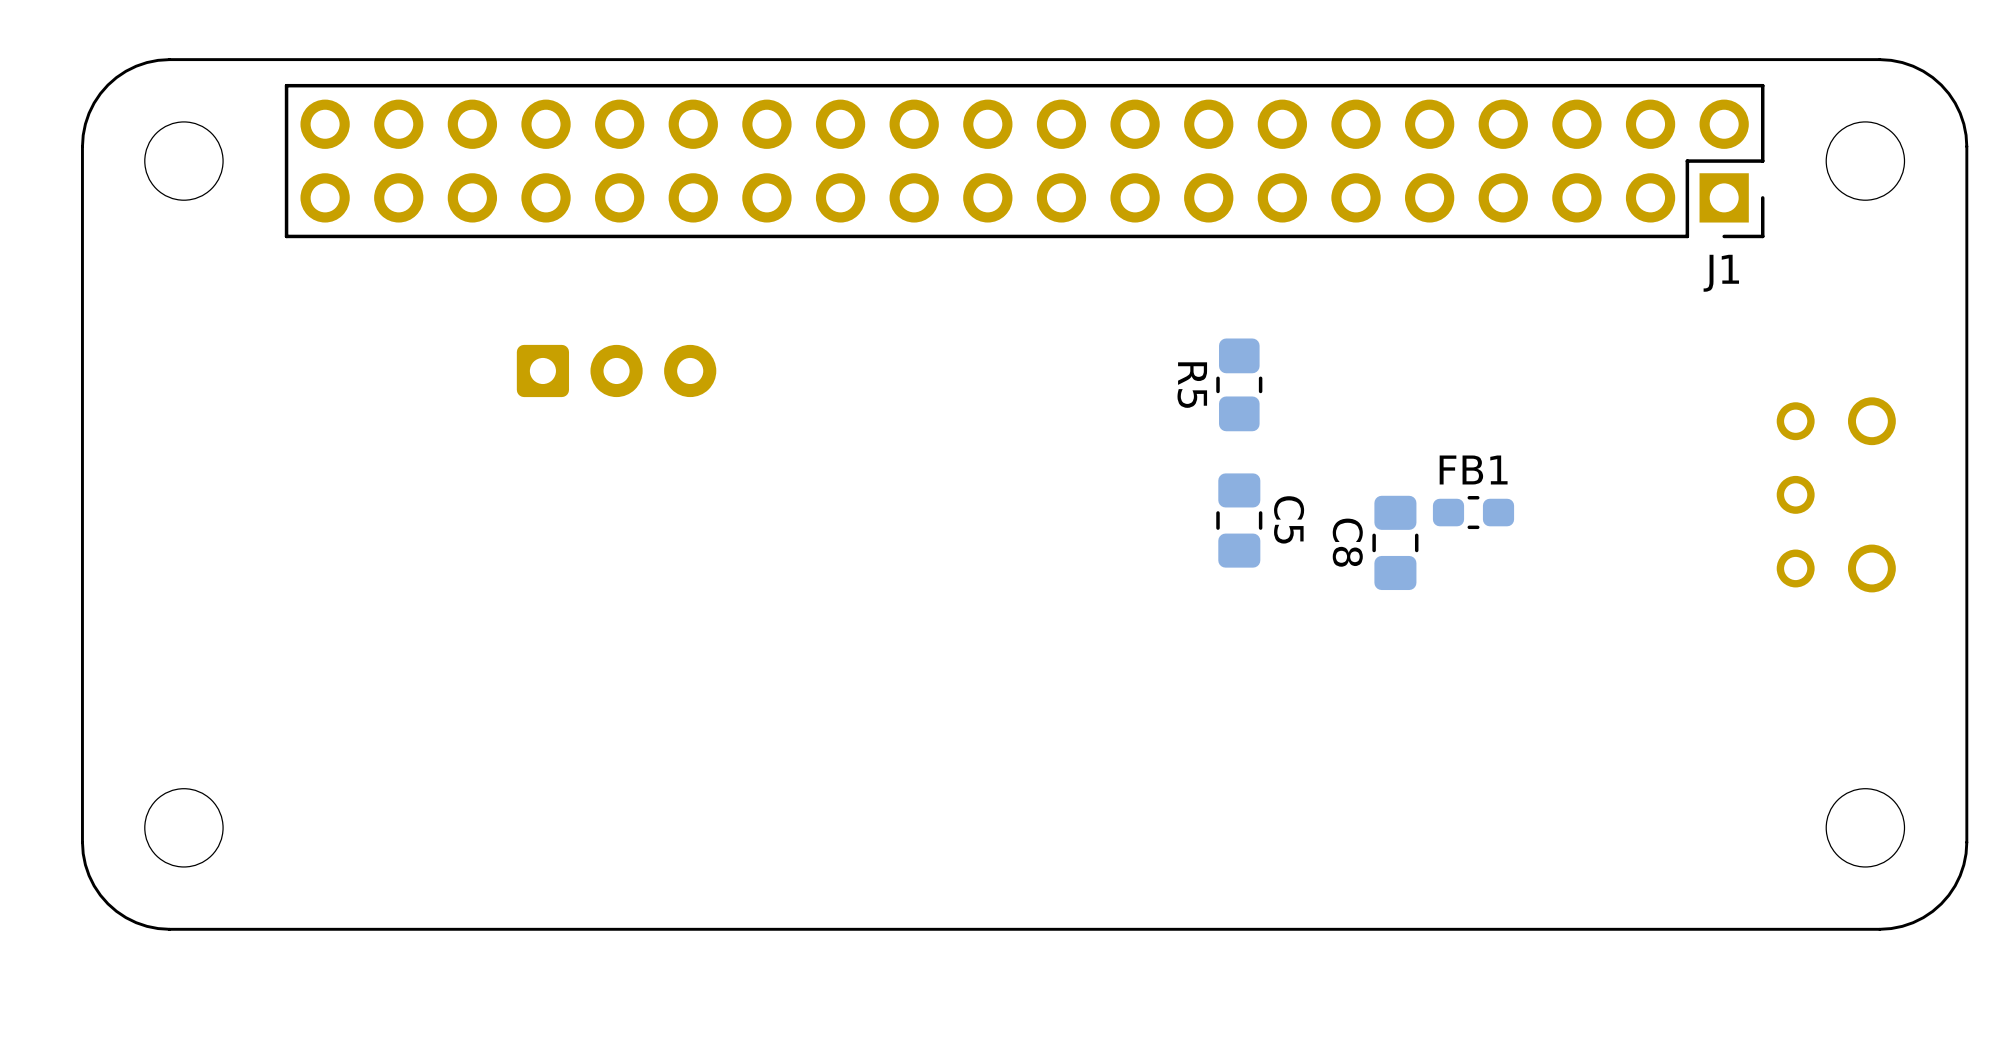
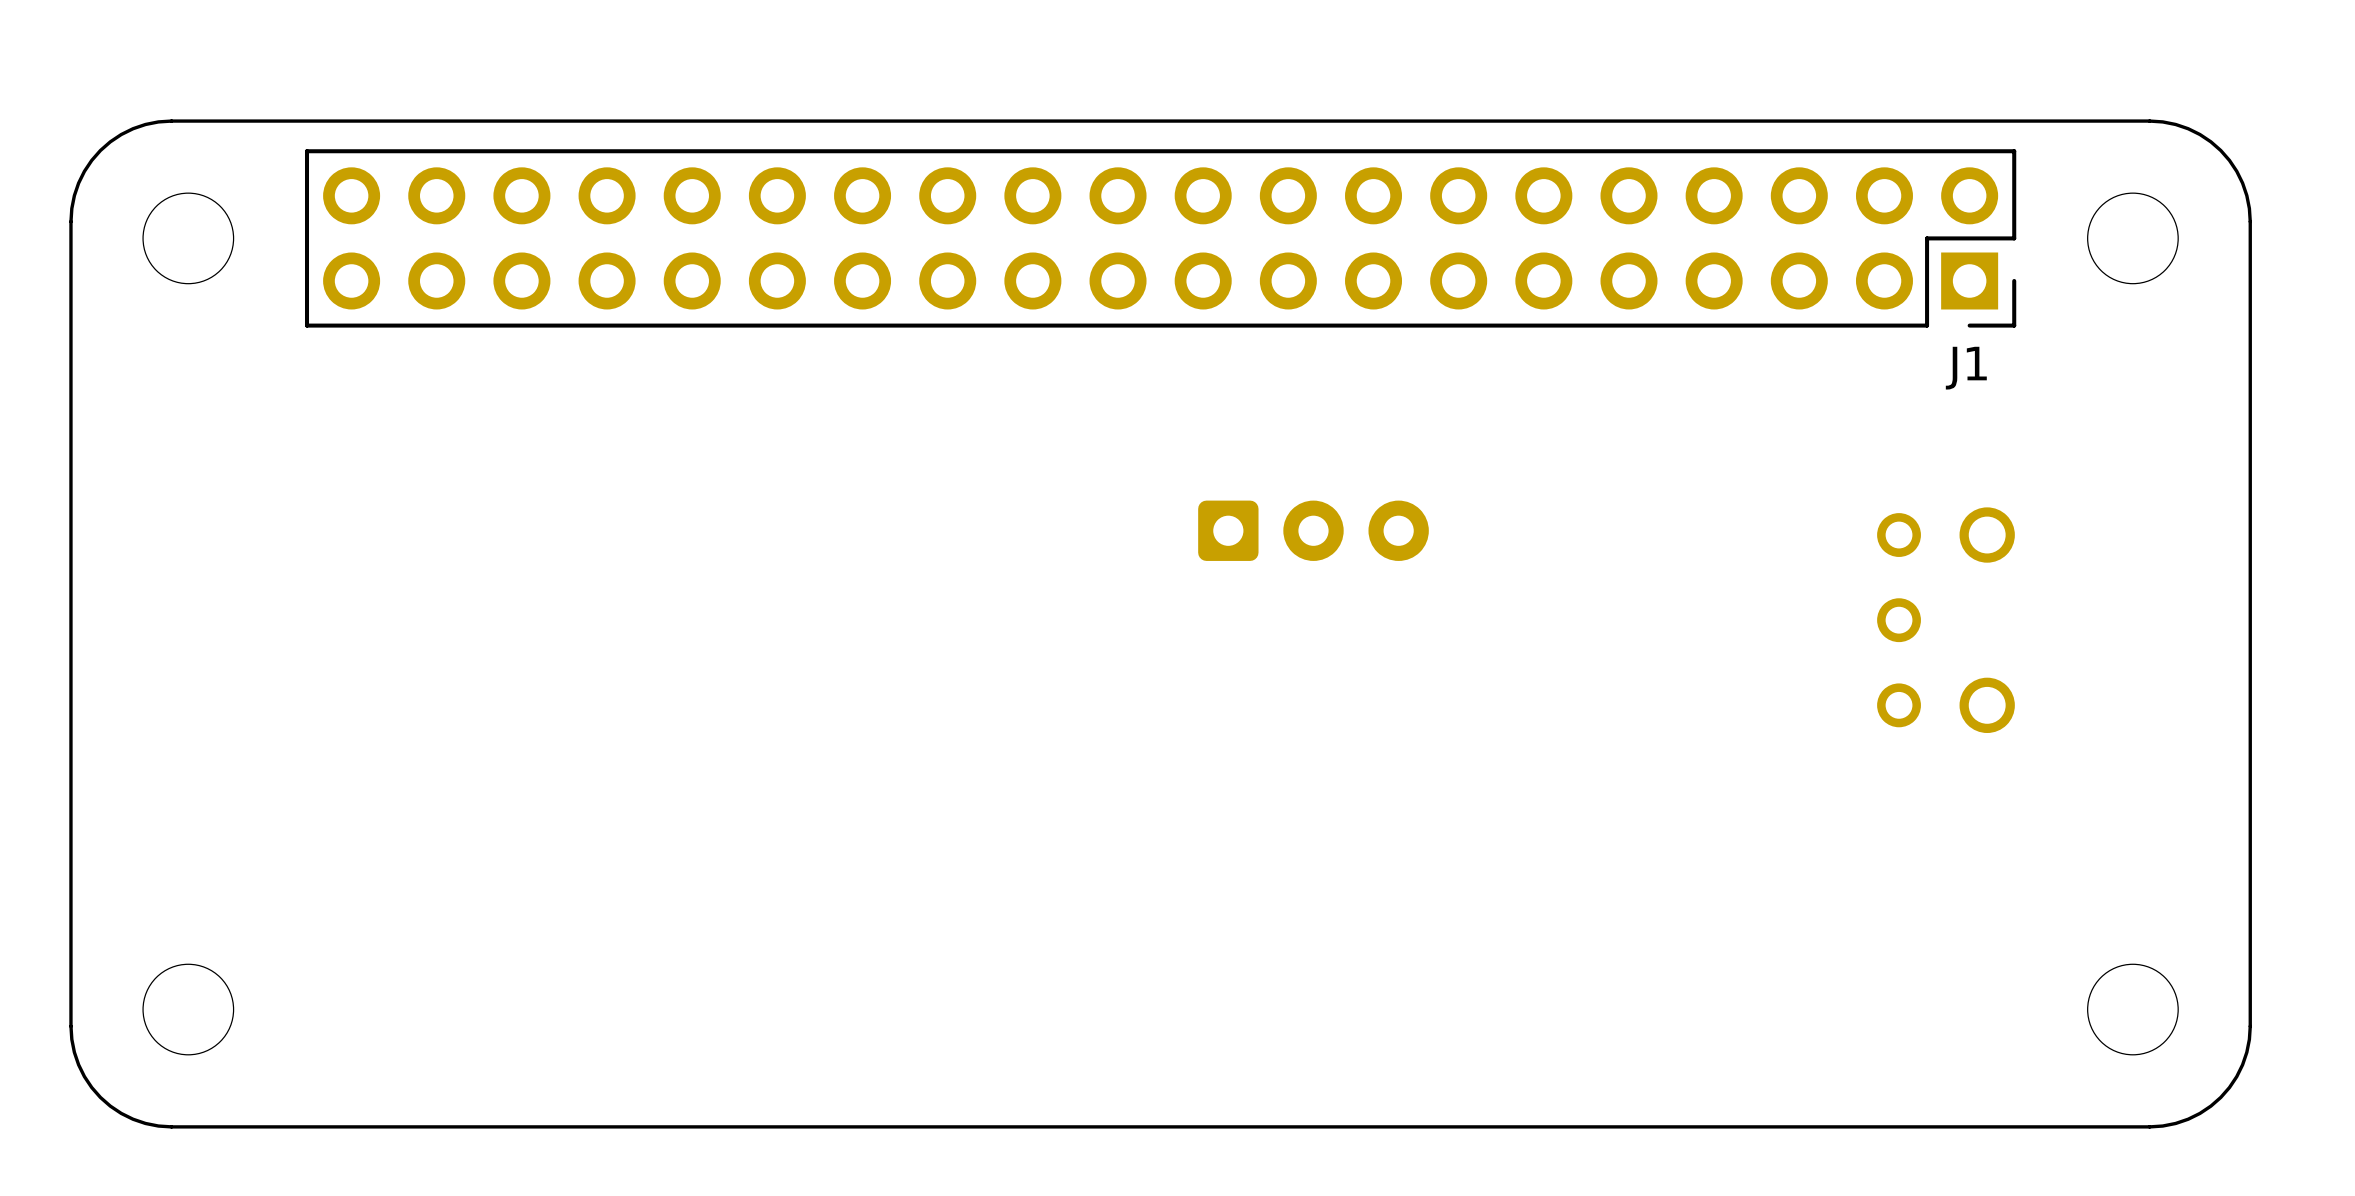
part position: (616, 370) -> (1313, 530)
R5: (1239, 384) -> none
part position: (1836, 494) -> (1945, 620)
FB1: (1473, 512) -> none
C5: (1239, 520) -> none
C8: (1395, 542) -> none

